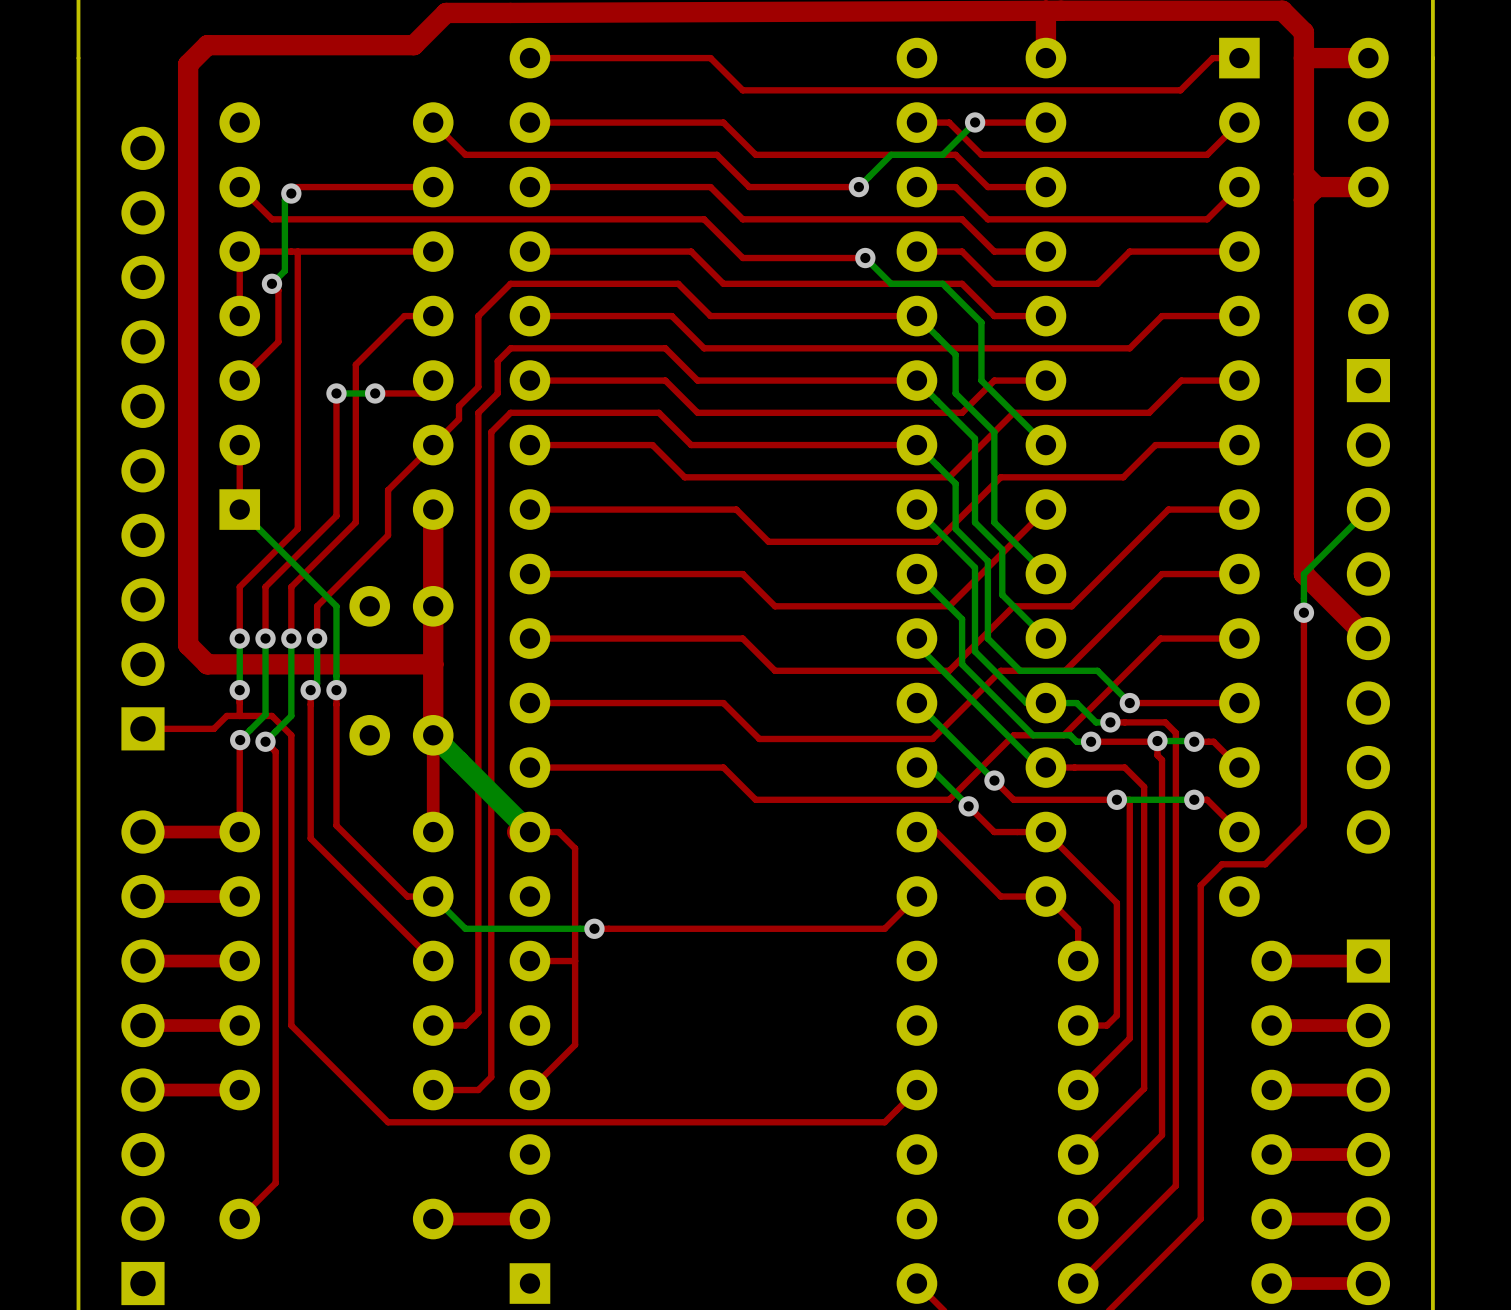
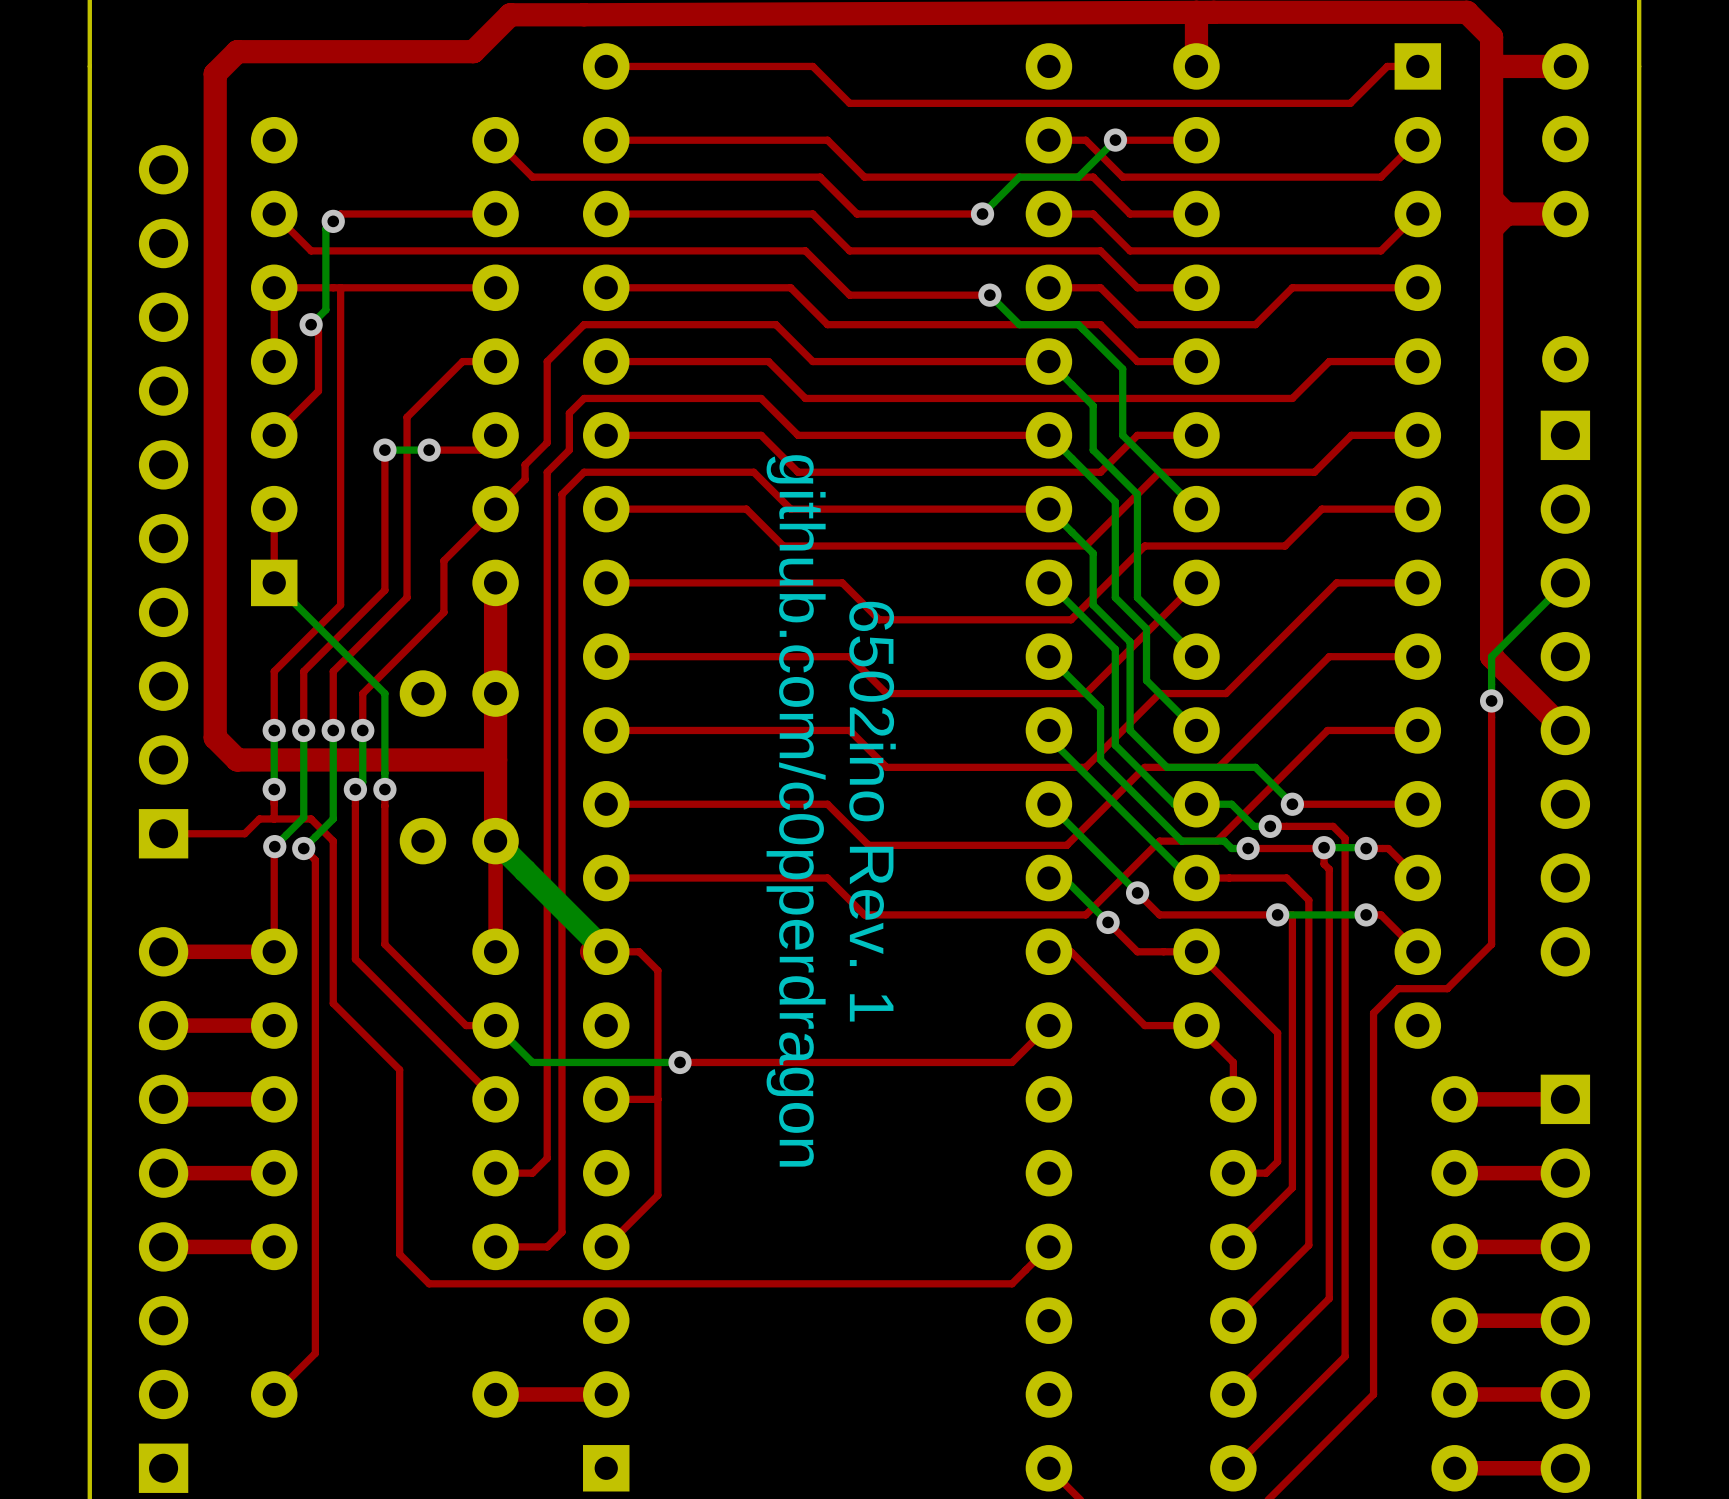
text: none -> github.com/c0pperdragon (796, 810)
text: none -> 6502ino Rev. 1 (872, 811)
top track: (291, 877) (291, 1025) (388, 1122) -> (333, 1003) (399, 1069) (399, 1254) (429, 1283) (443, 1283)

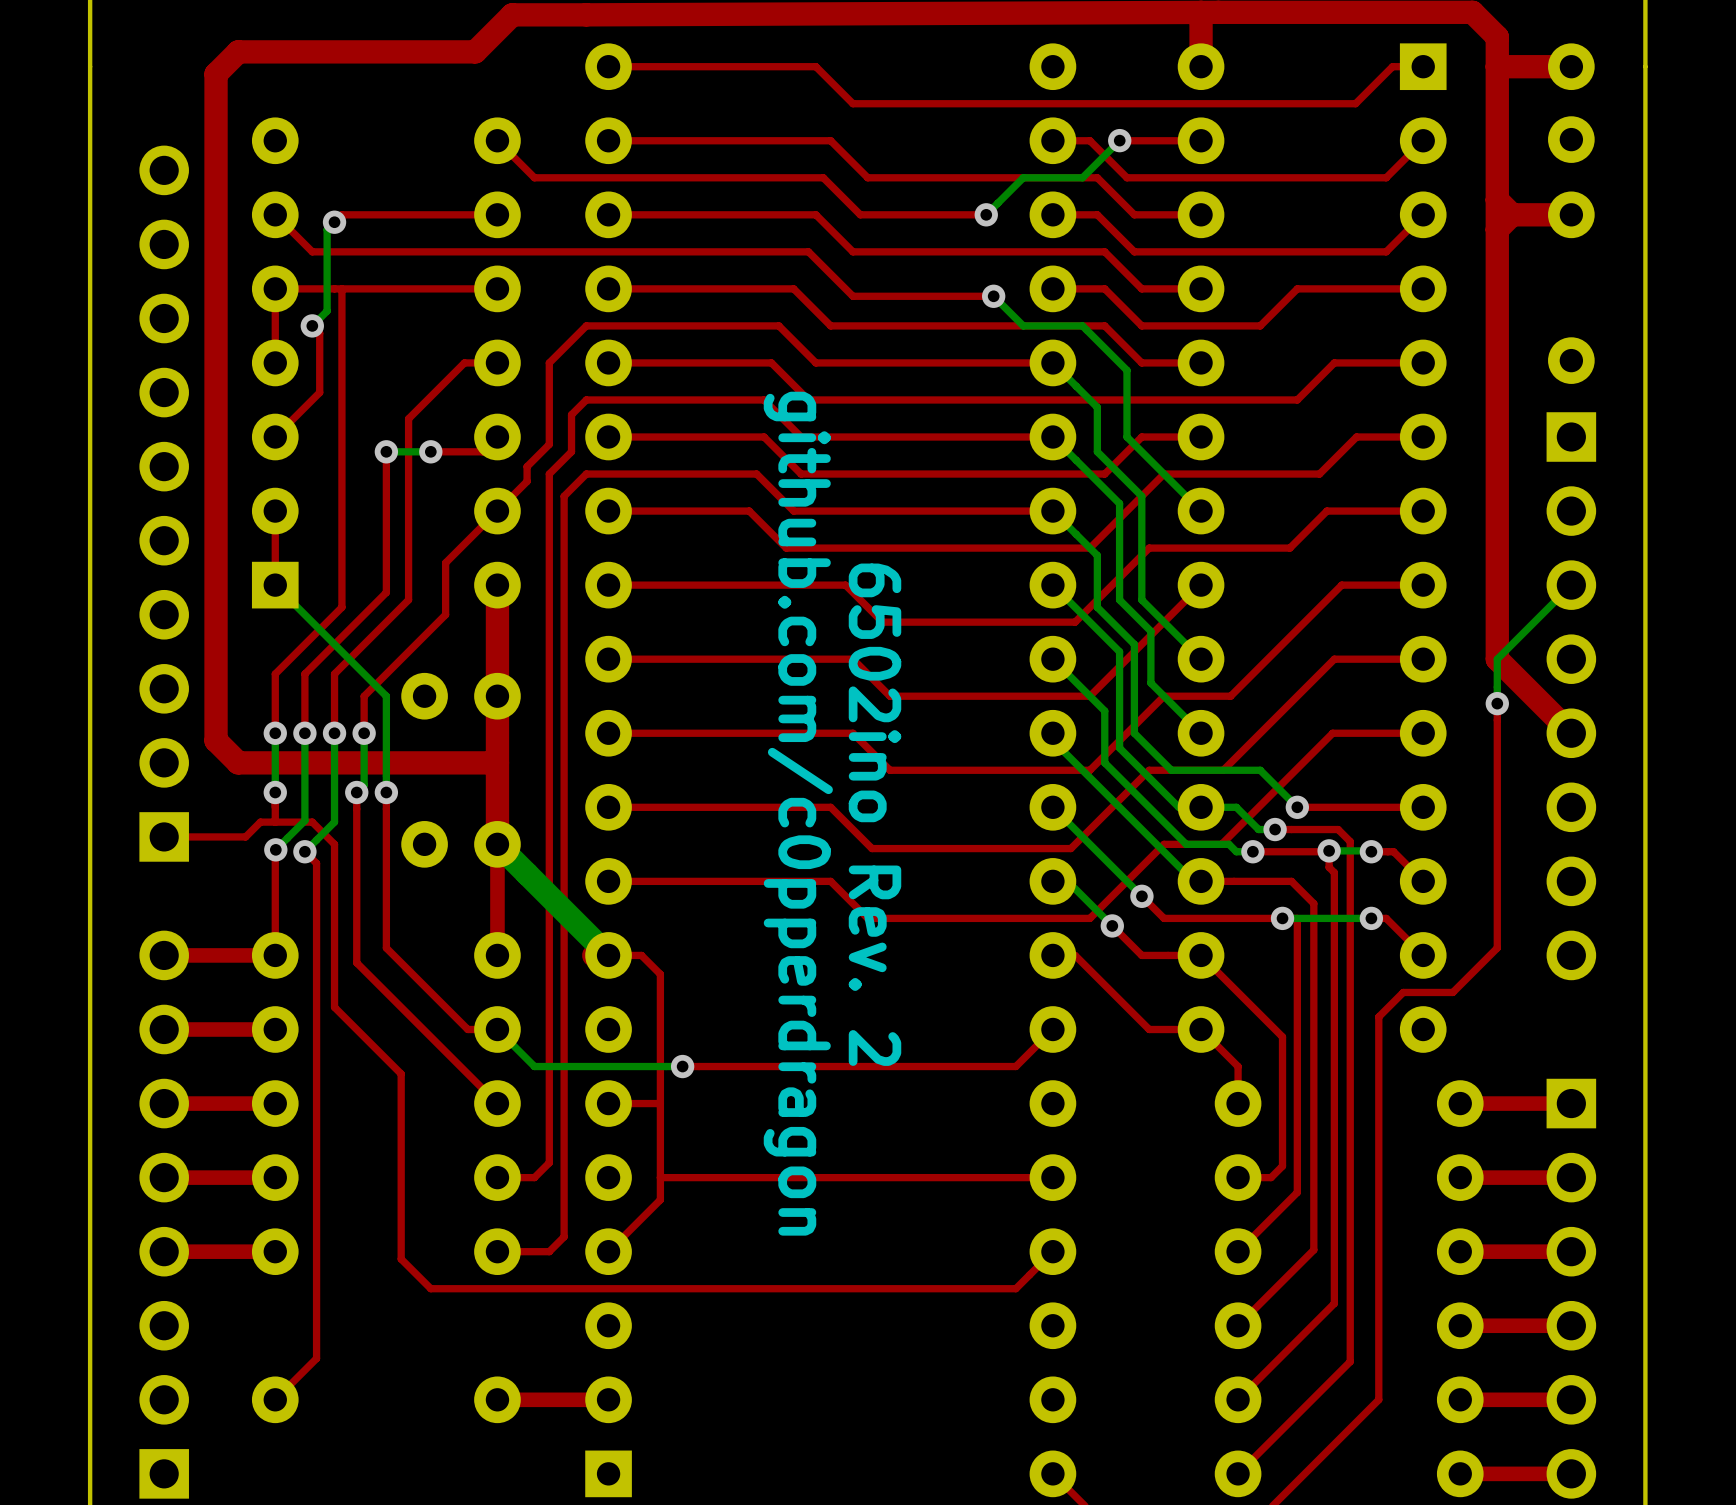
text: 6502ino Rev. 1 (872, 811) -> 6502ino Rev. 2 (874, 814)
top track: none -> (1052, 1177) (660, 1177)

